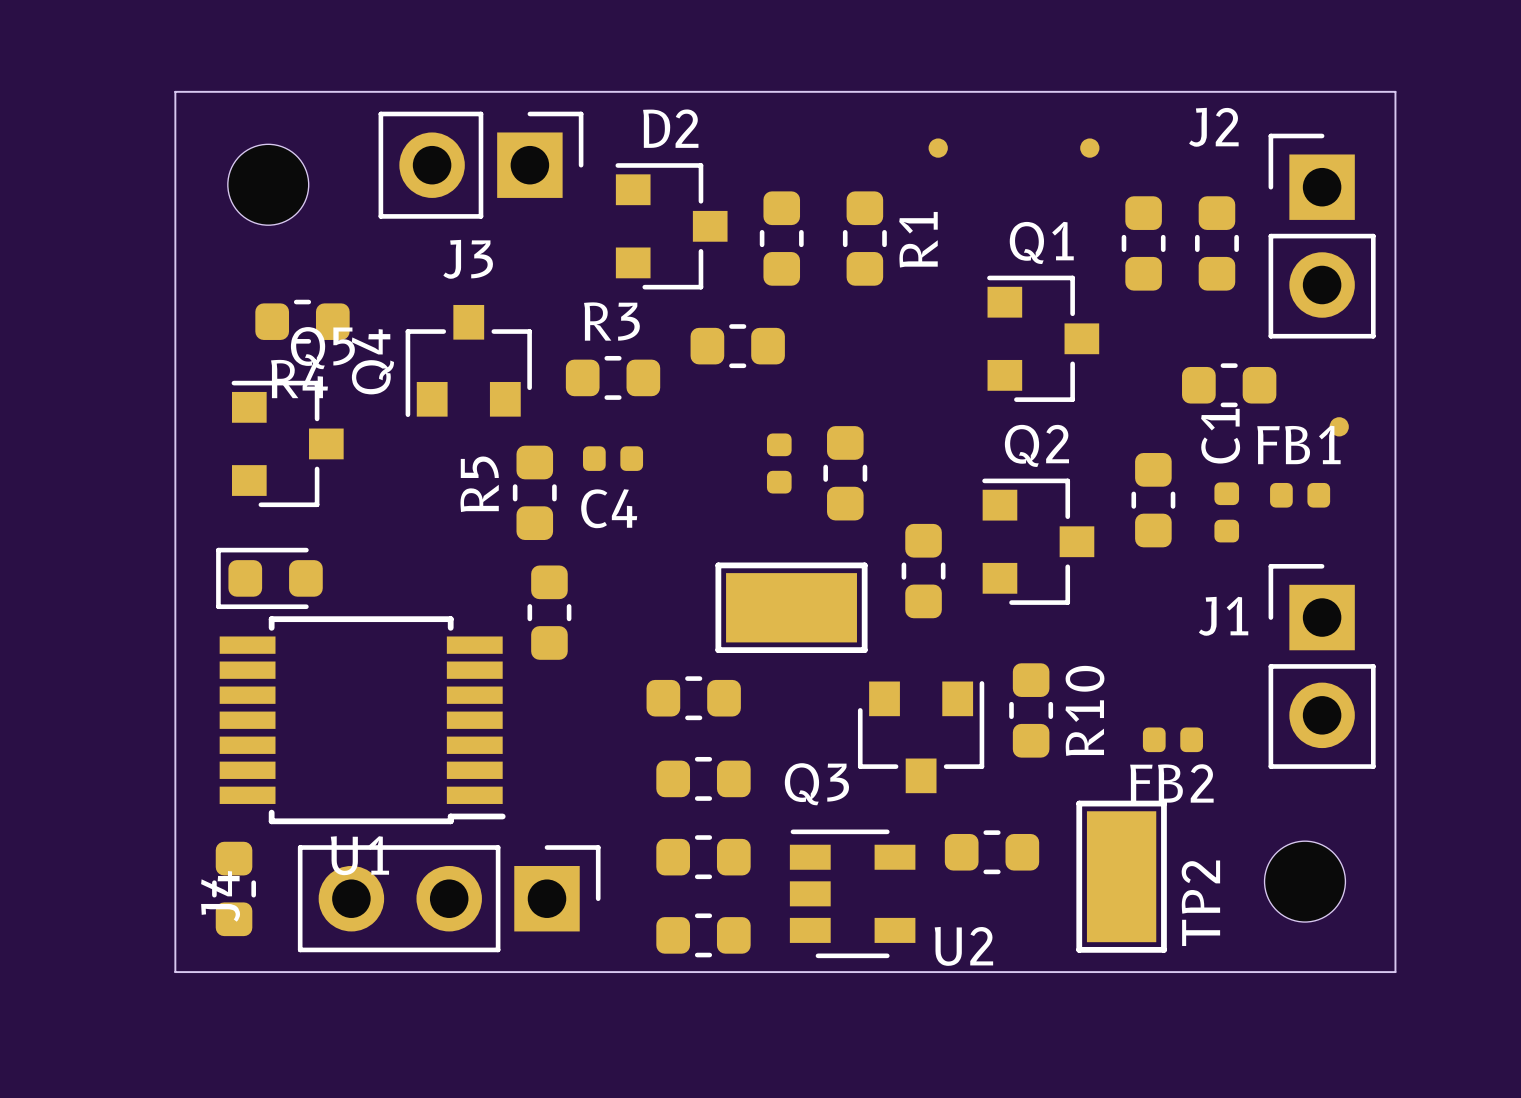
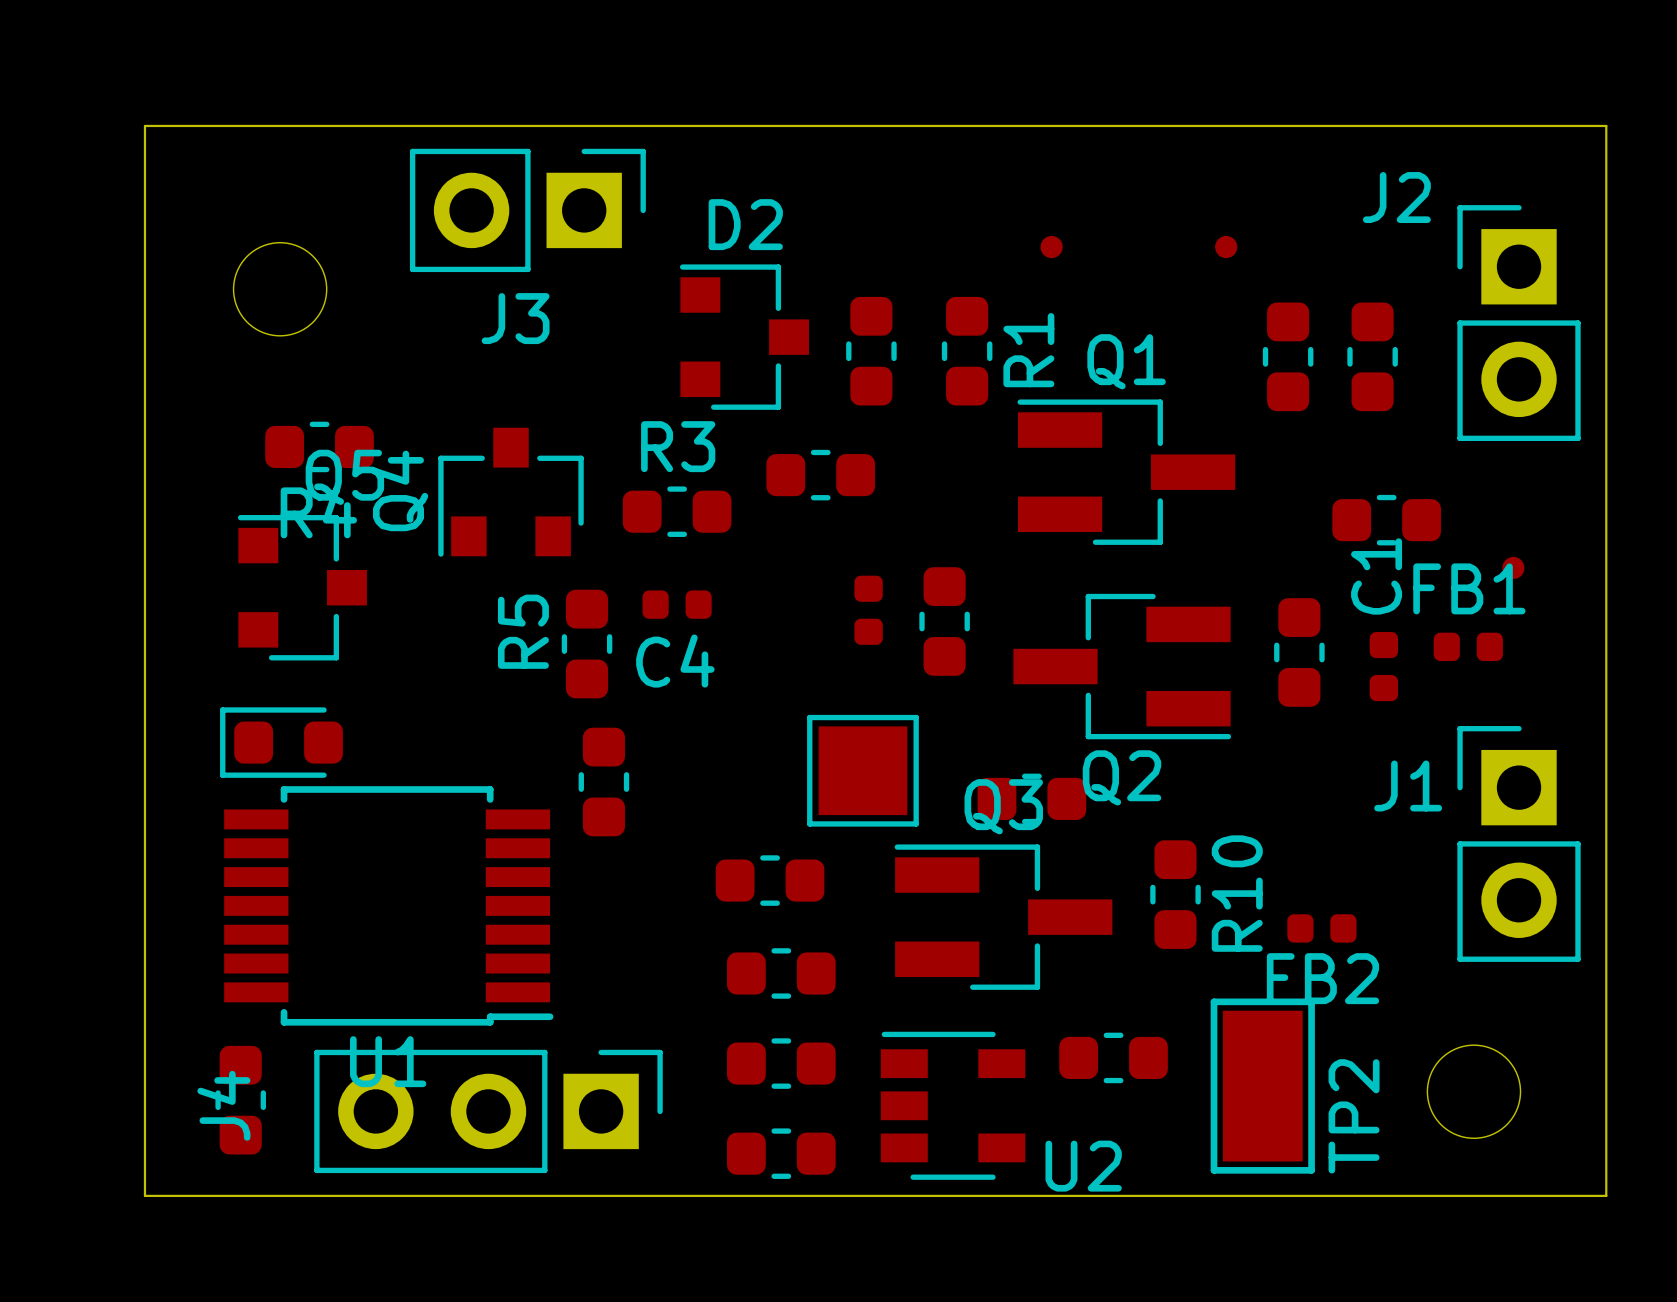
J3 position: (480, 165) -> (527, 210)
J2 position: (1322, 236) -> (1519, 323)
Q1 footprint: [987, 275, 1100, 402] -> [1017, 399, 1236, 545]
Q2 name position: Q2 (1036, 445) -> Q2 (1122, 777)
Q2 footprint: [982, 478, 1095, 605] -> [1013, 593, 1232, 740]
part footprint: [715, 562, 868, 654] -> [807, 714, 919, 827]
part rotation: 0° (923, 571) -> 90° clockwise (1031, 798)
J1 position: (1322, 666) -> (1519, 843)
Q3 footprint: [857, 681, 985, 794] -> [894, 844, 1113, 990]
R10 position: (1031, 710) -> (1175, 894)
Q3 name position: Q3 (816, 784) -> Q3 (1003, 806)
board edge: (175, 972) (175, 91) (1395, 91) (1395, 972) -> (173, 1195) (144, 1195) (144, 125) (1606, 125) (1606, 1195) (1578, 1195)

